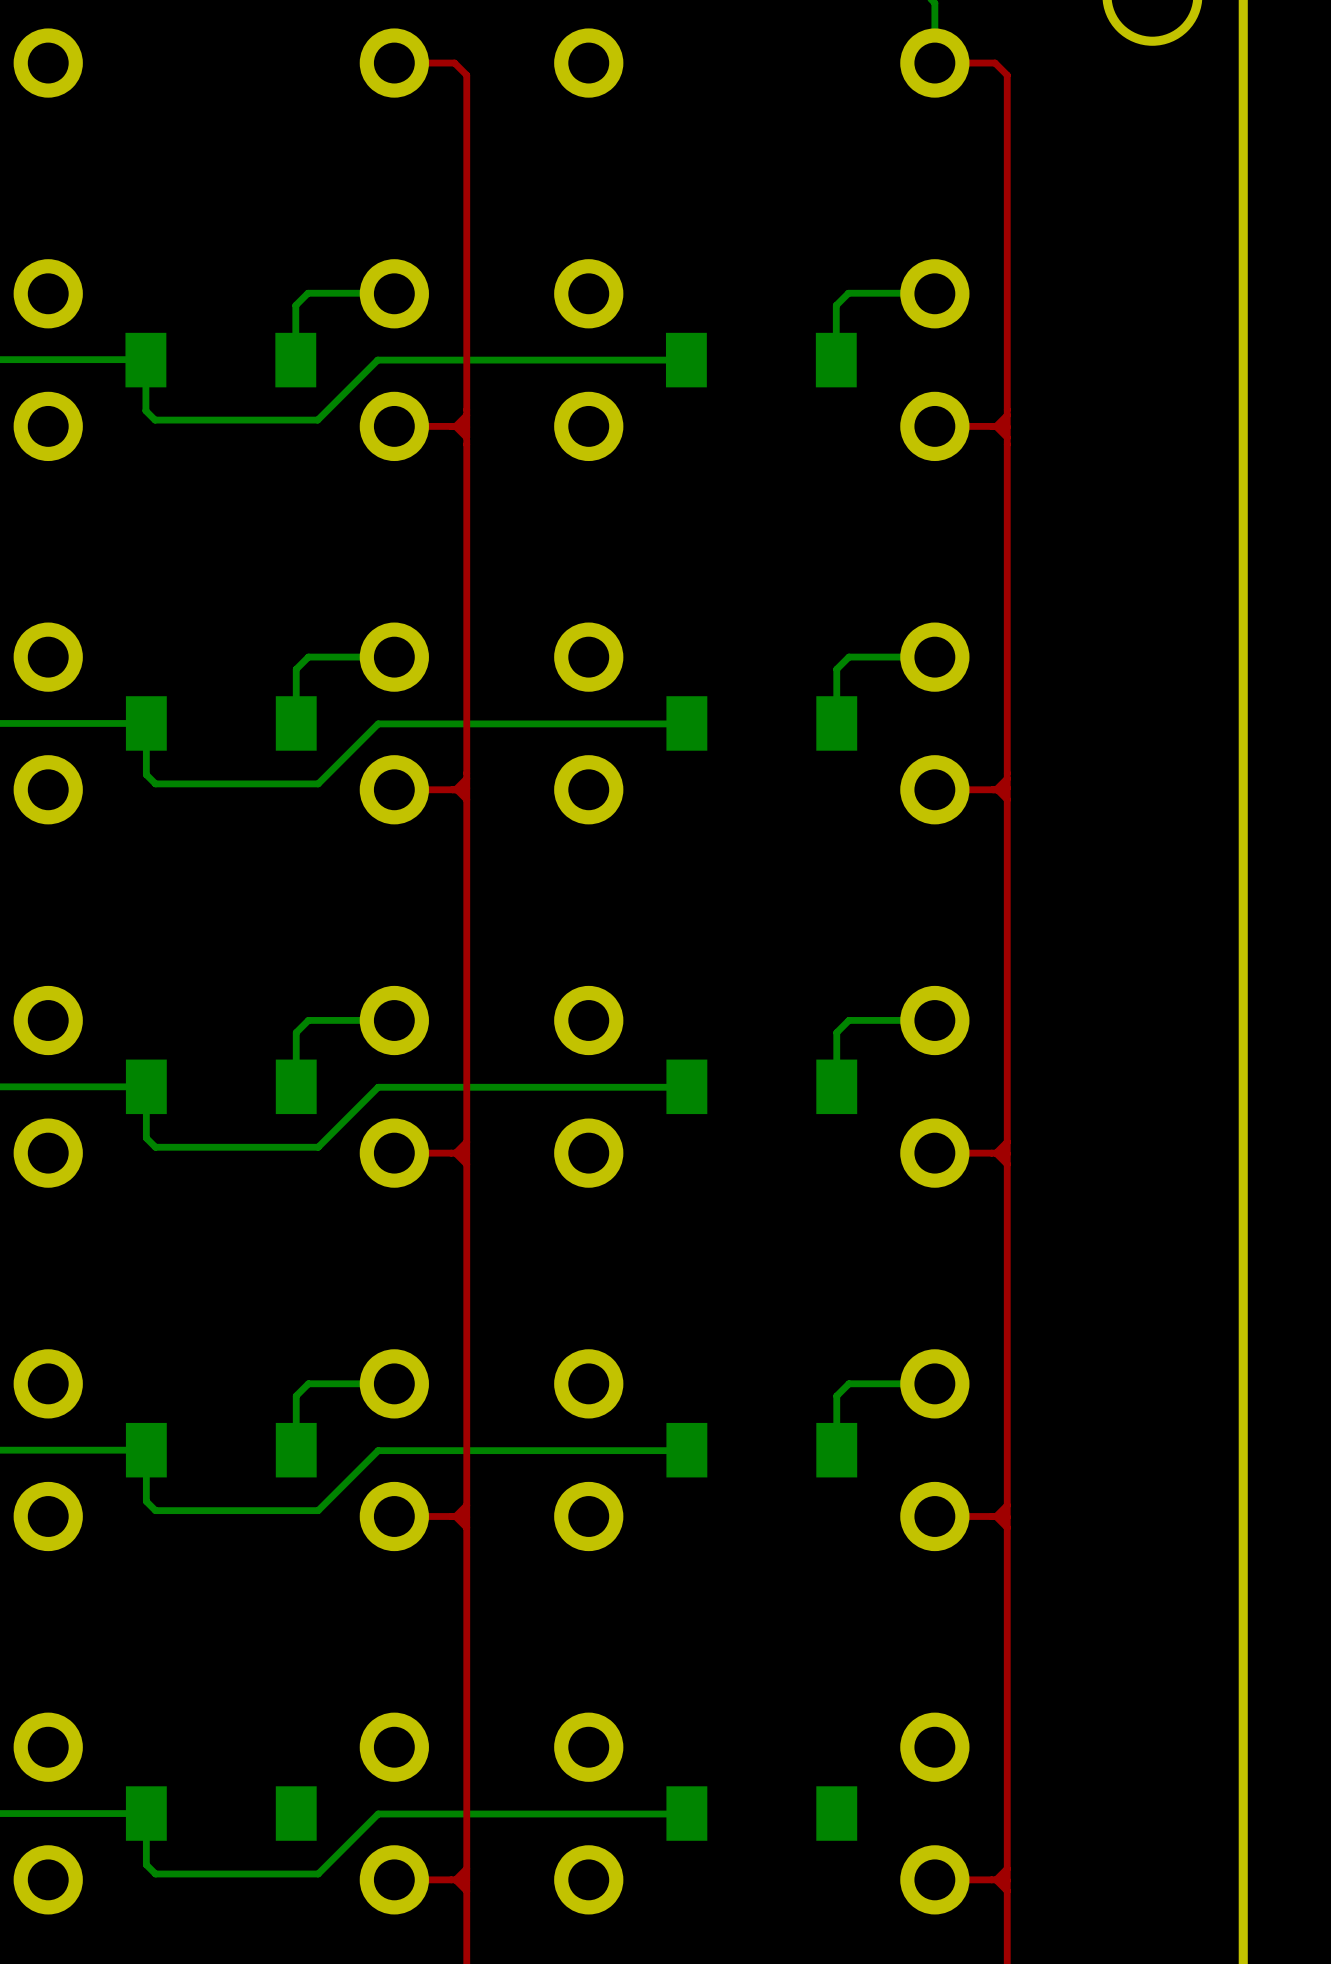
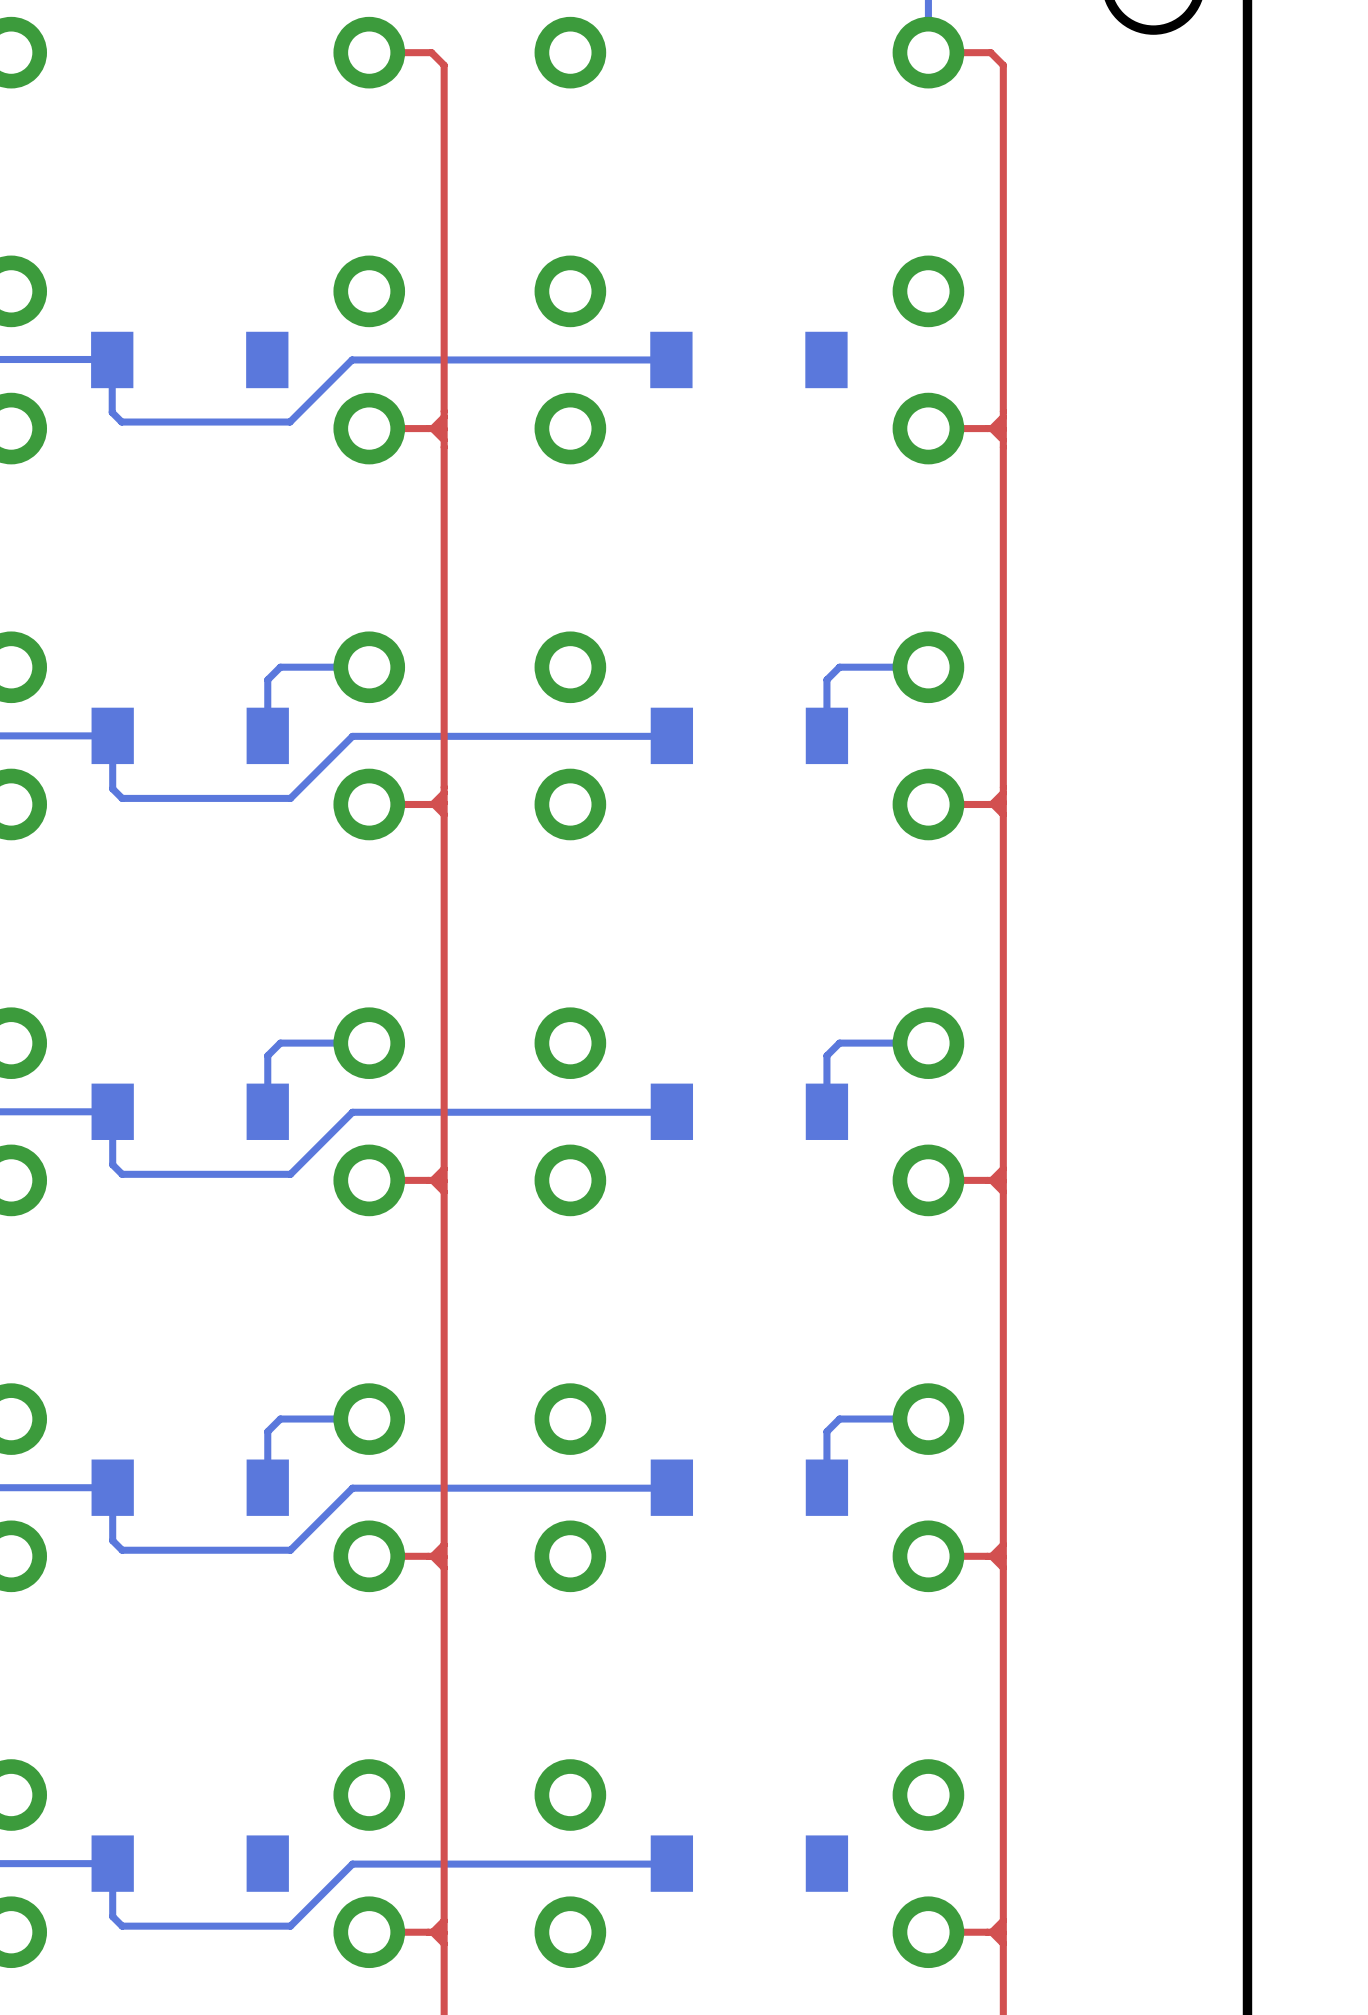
bottom track: (397, 293) (308, 293) (295, 305) (295, 359) -> none
bottom track: (938, 293) (848, 293) (836, 305) (836, 359) -> none

